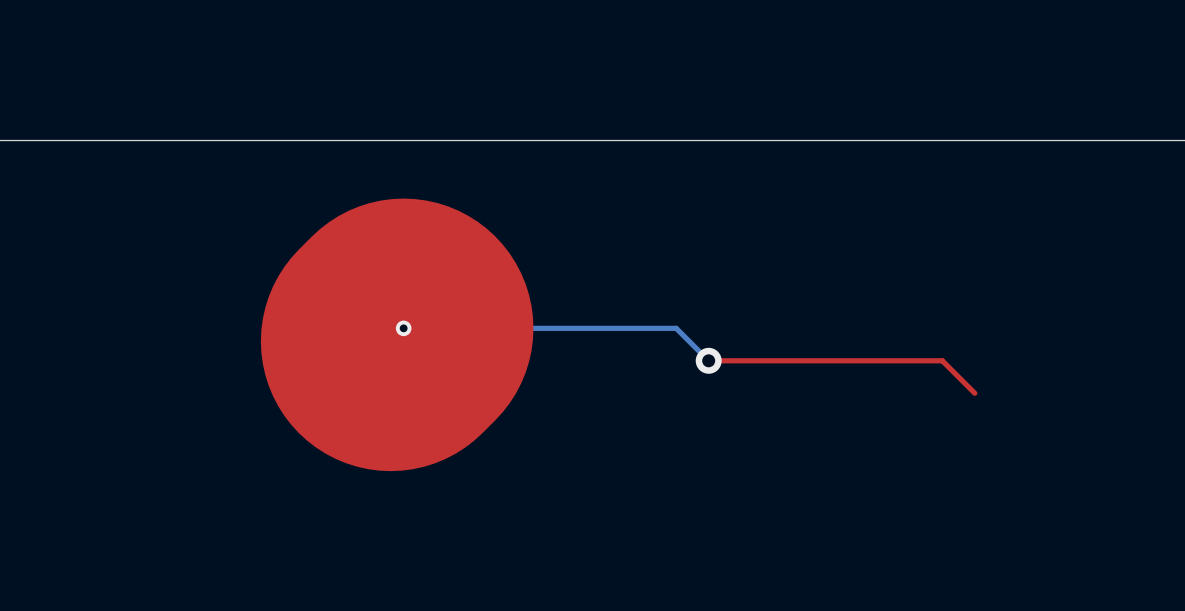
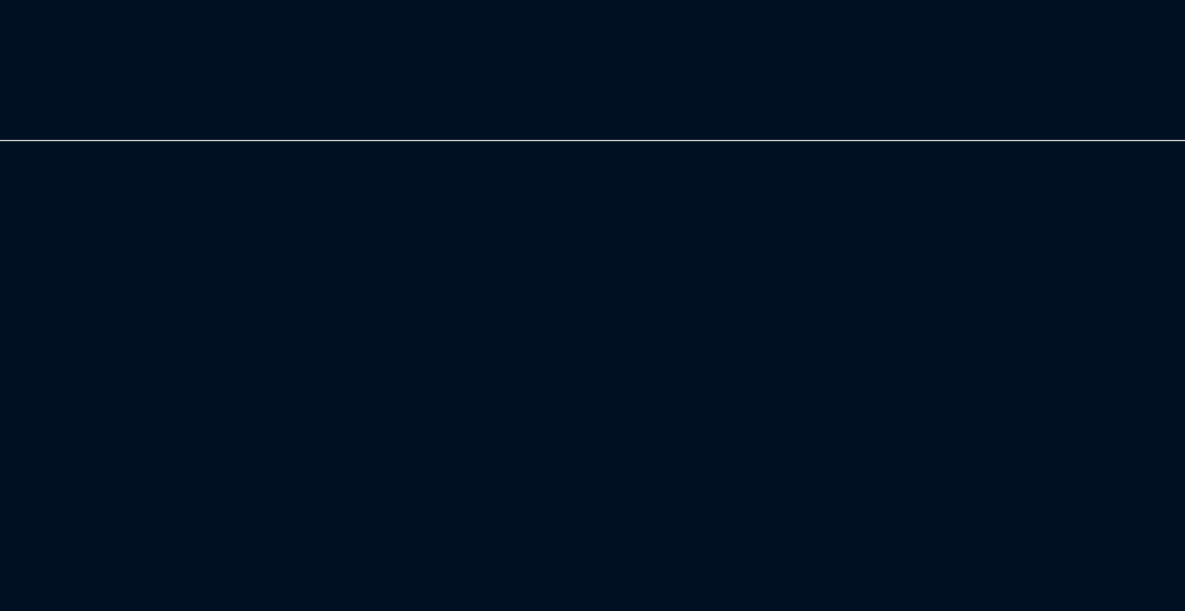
top track: (403, 328) (390, 341) -> none
bottom track: (403, 328) (676, 328) (708, 360) -> none
via: (403, 328) -> none
top track: (708, 360) (942, 360) (974, 393) -> none
via: (708, 360) -> none

